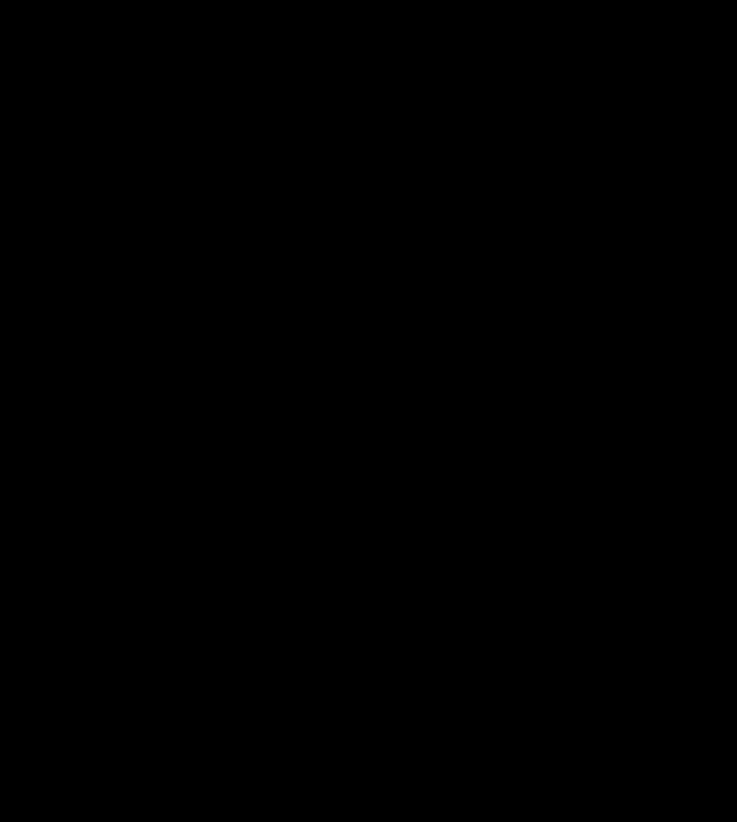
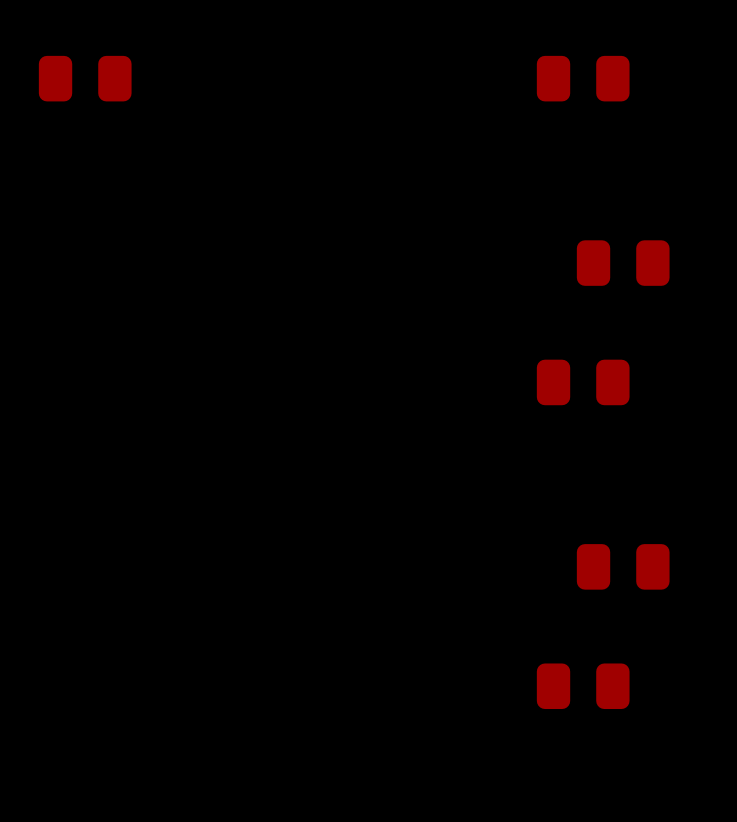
part: none -> (85, 78)
part: none -> (583, 78)
part: none -> (623, 263)
part: none -> (583, 382)
part: none -> (623, 566)
part: none -> (583, 686)

